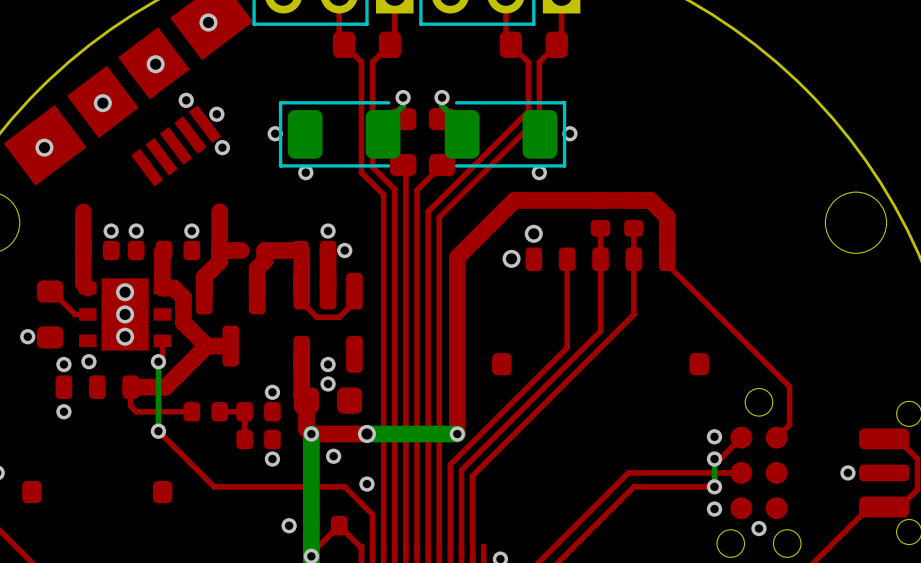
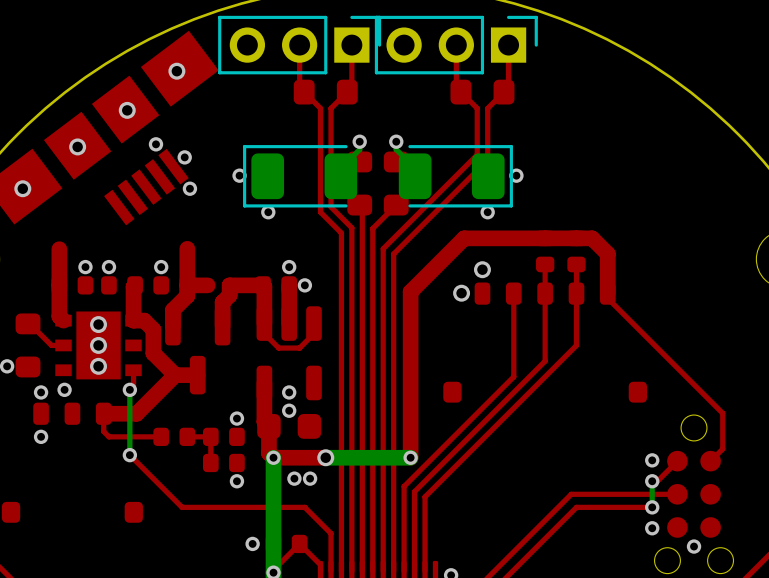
via position: (366, 484) -> (310, 478)

